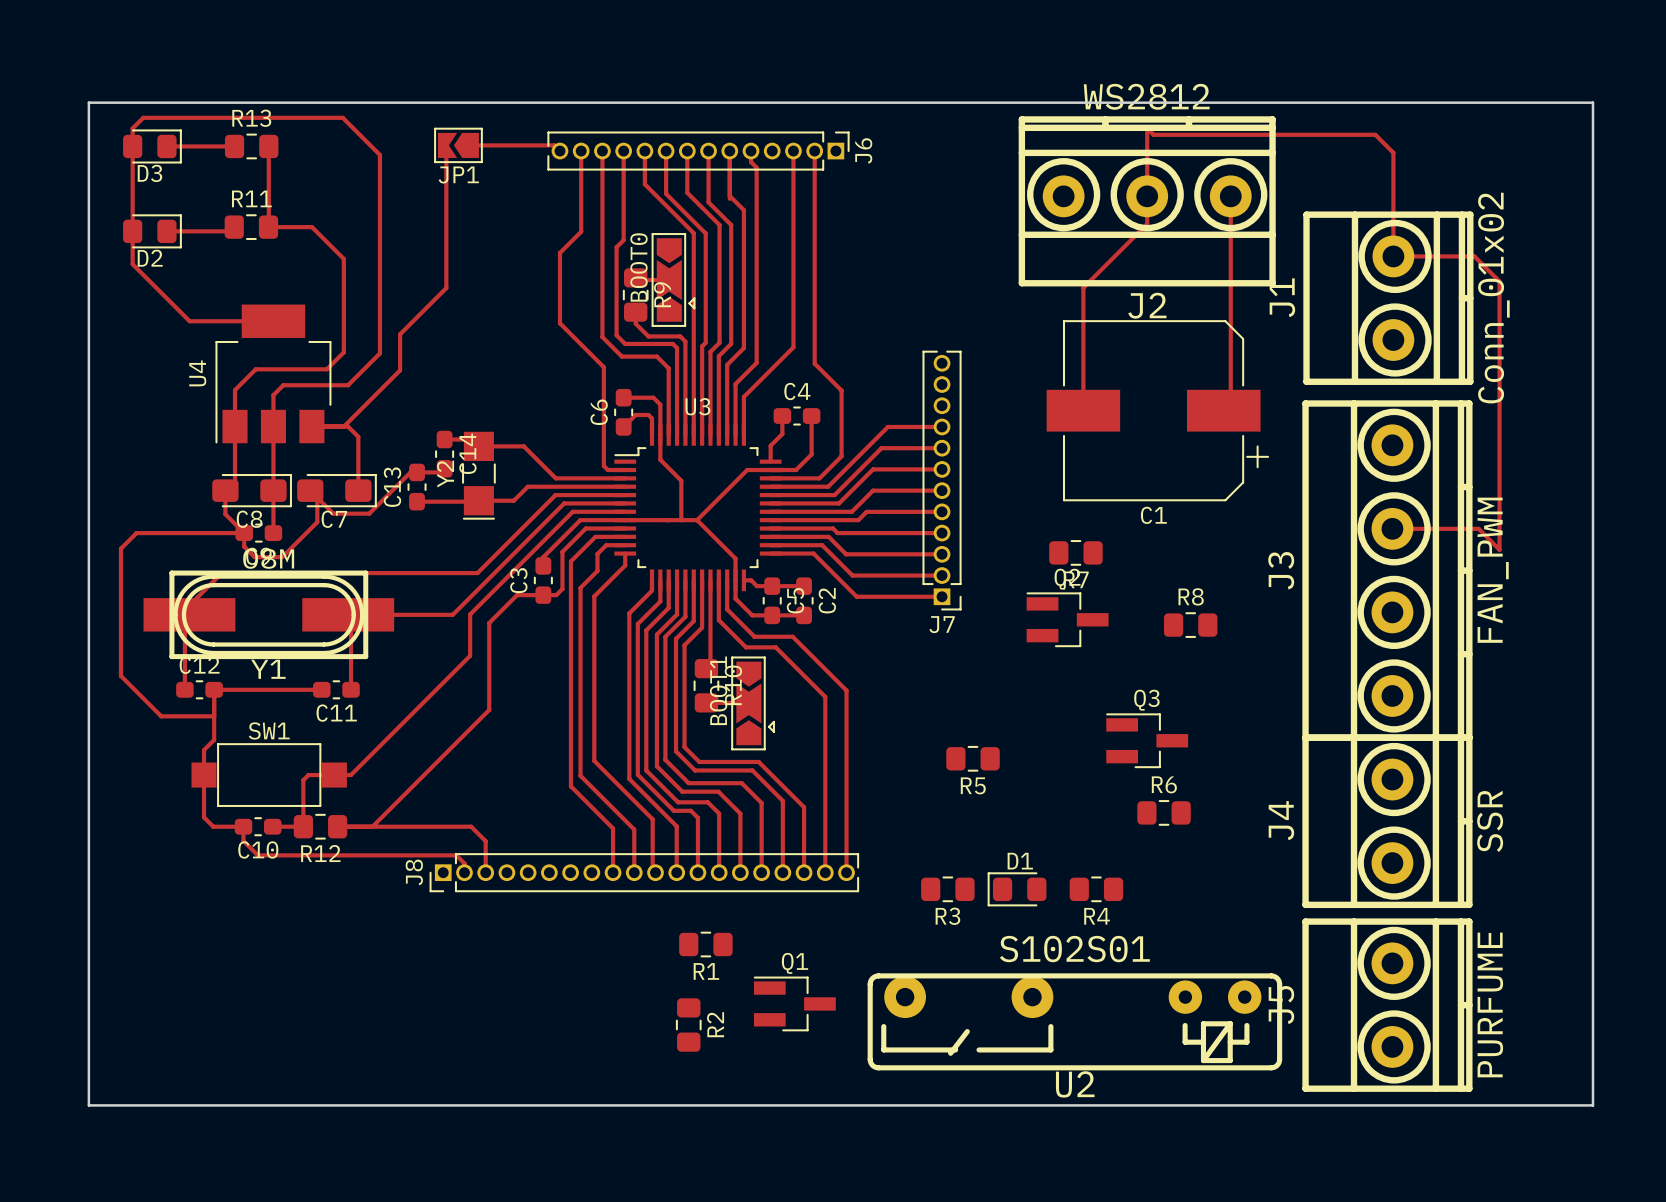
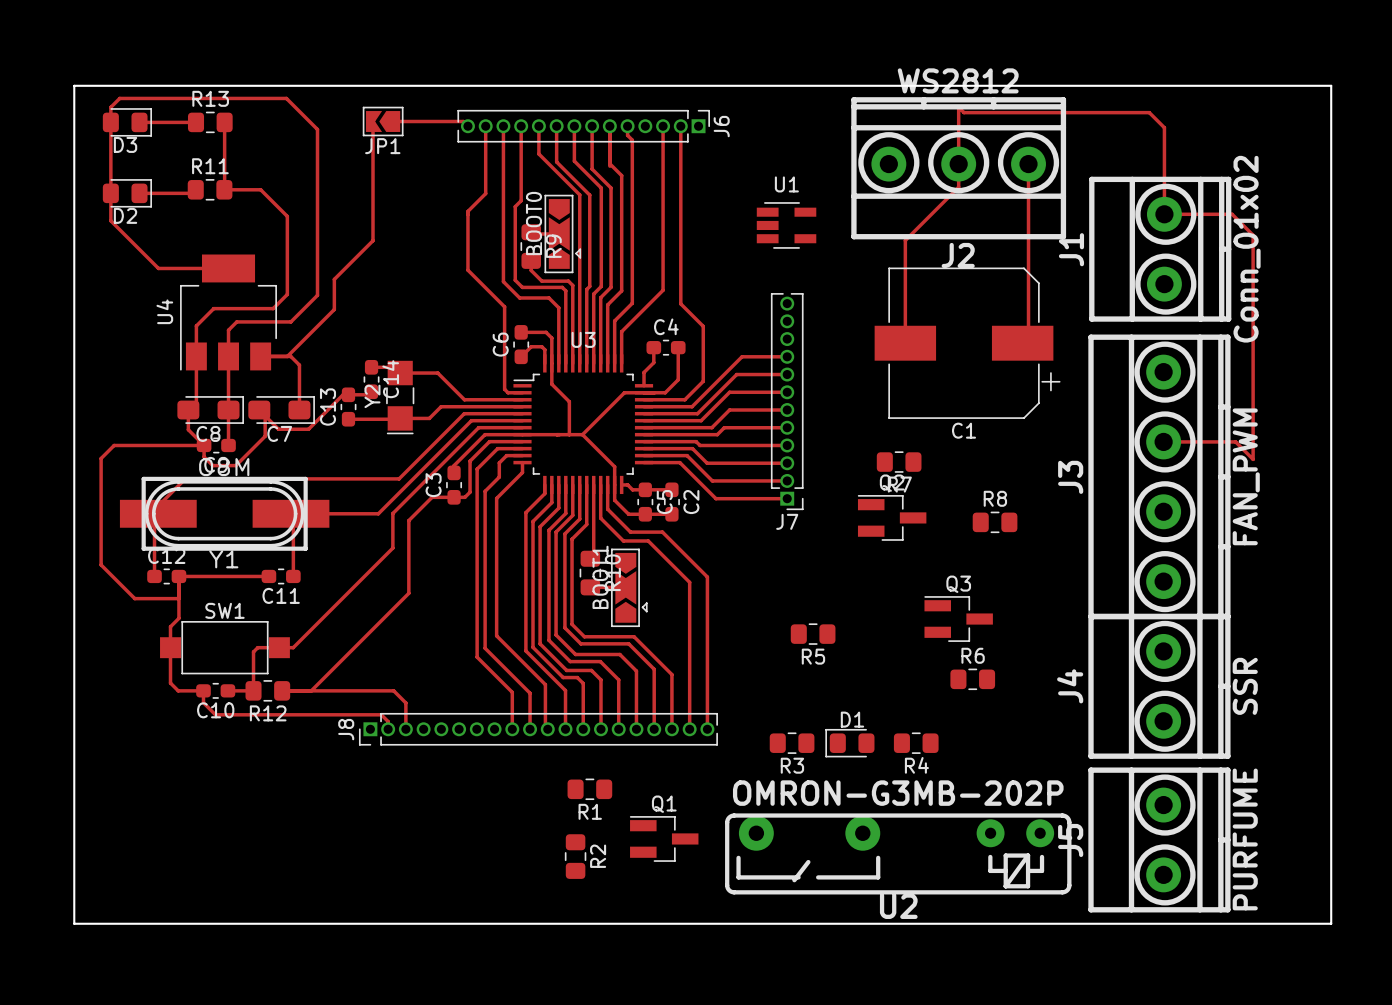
U1: none -> (786, 225)
U2 value: S102S01 (1074, 949) -> OMRON-G3MB-202P (898, 793)

